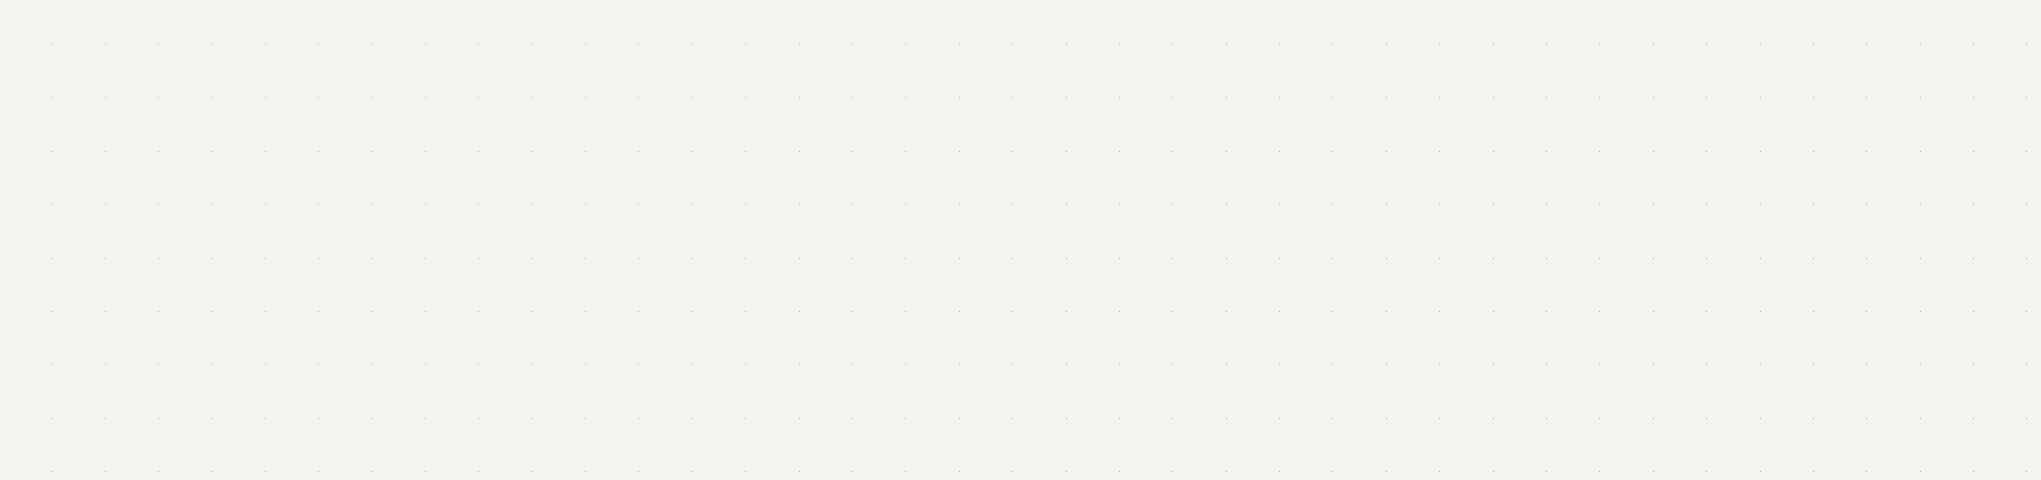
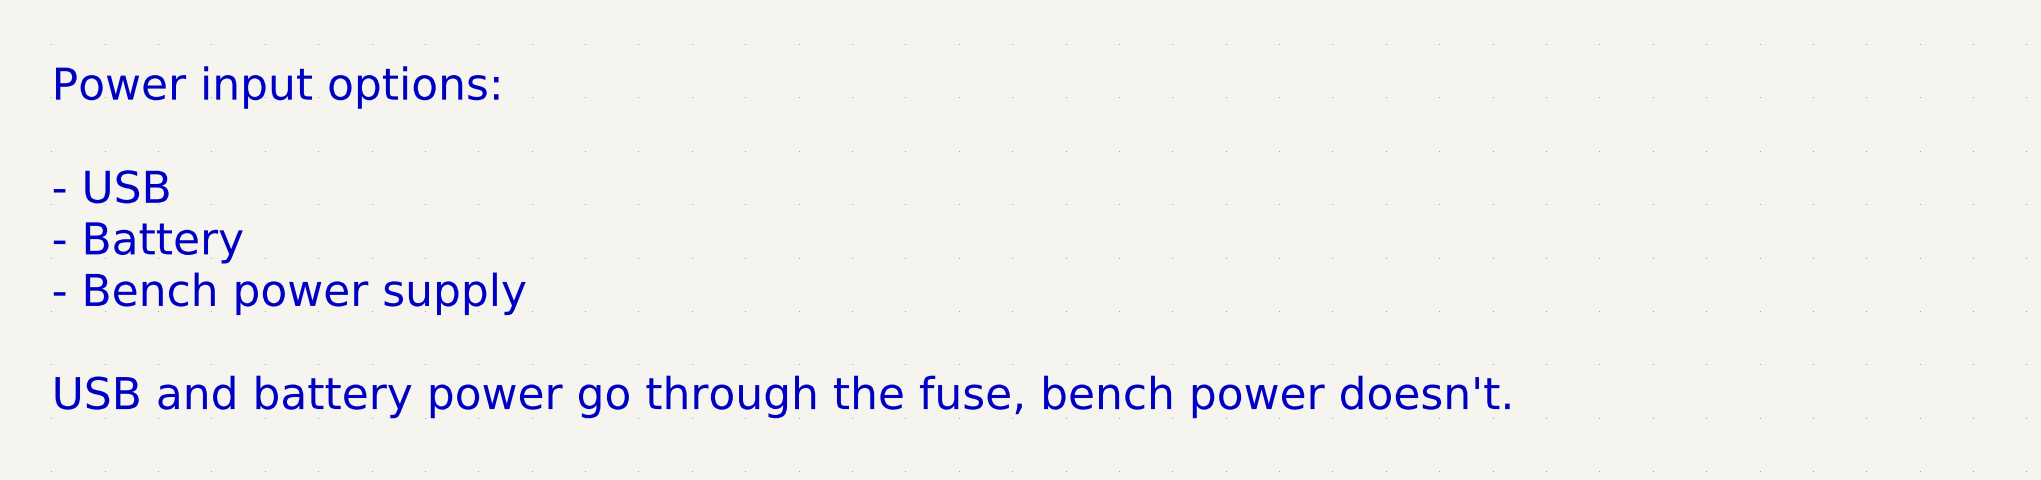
text: none -> Power input options: (277, 87)
text: none -> - USB (111, 186)
text: none -> - Battery (148, 242)
text: none -> - Bench power supply (289, 293)
text: none -> USB and battery power go through the fuse, bench power doesn't. (782, 396)

